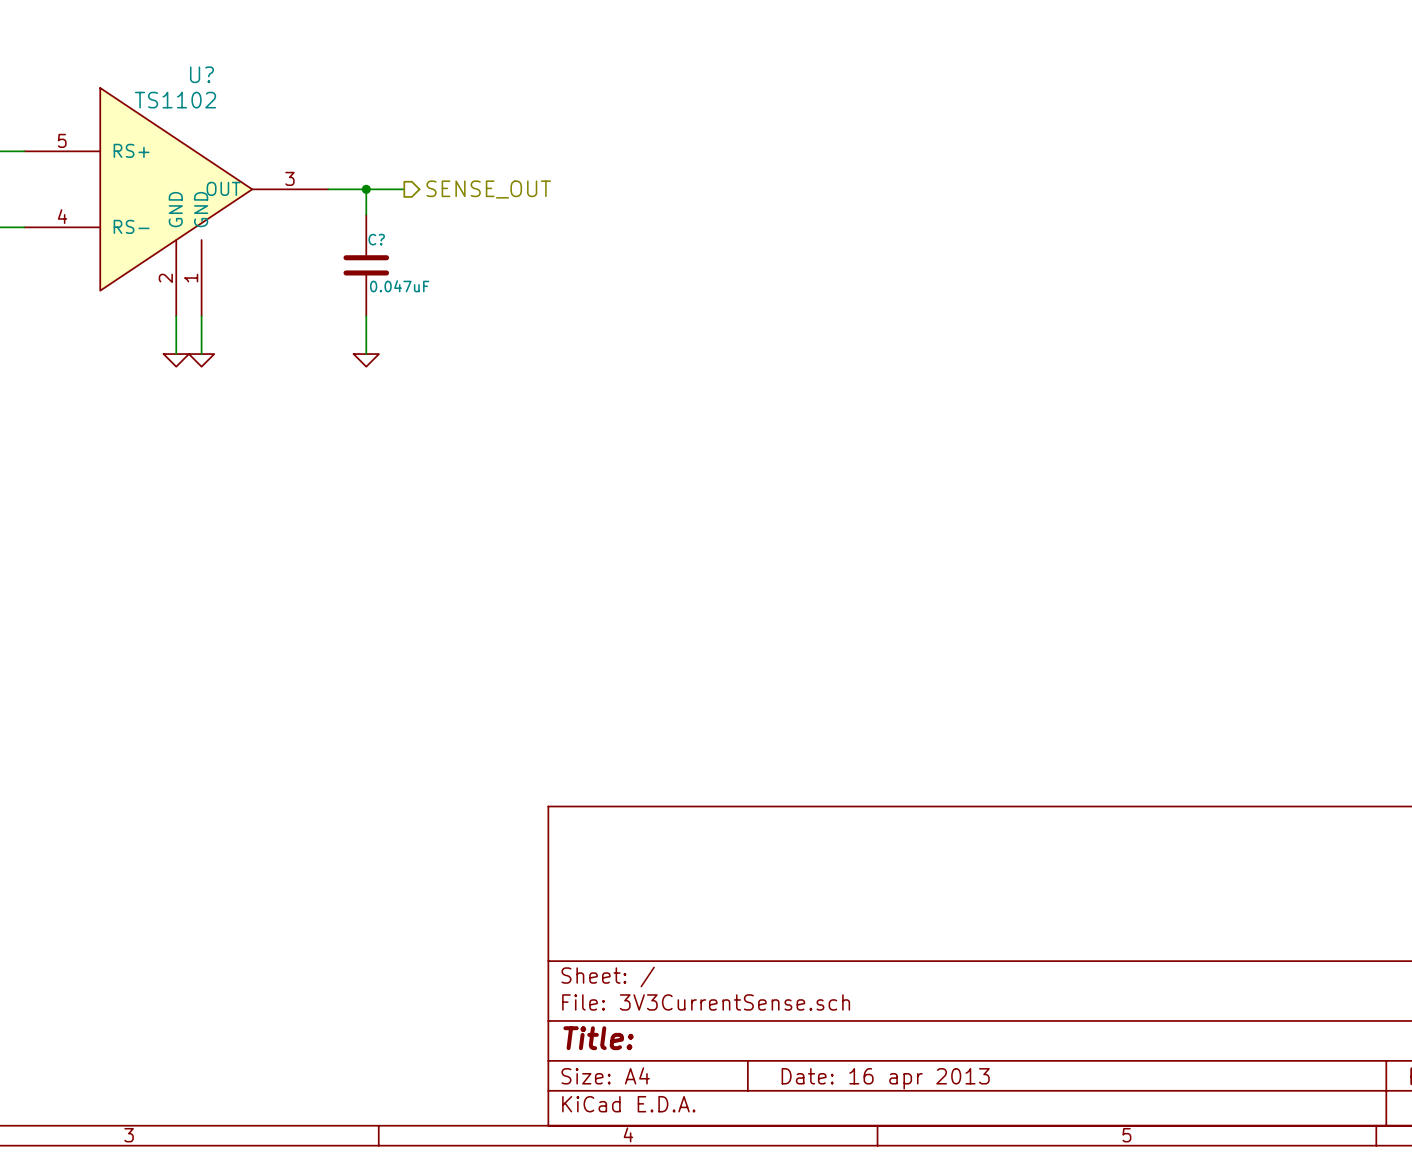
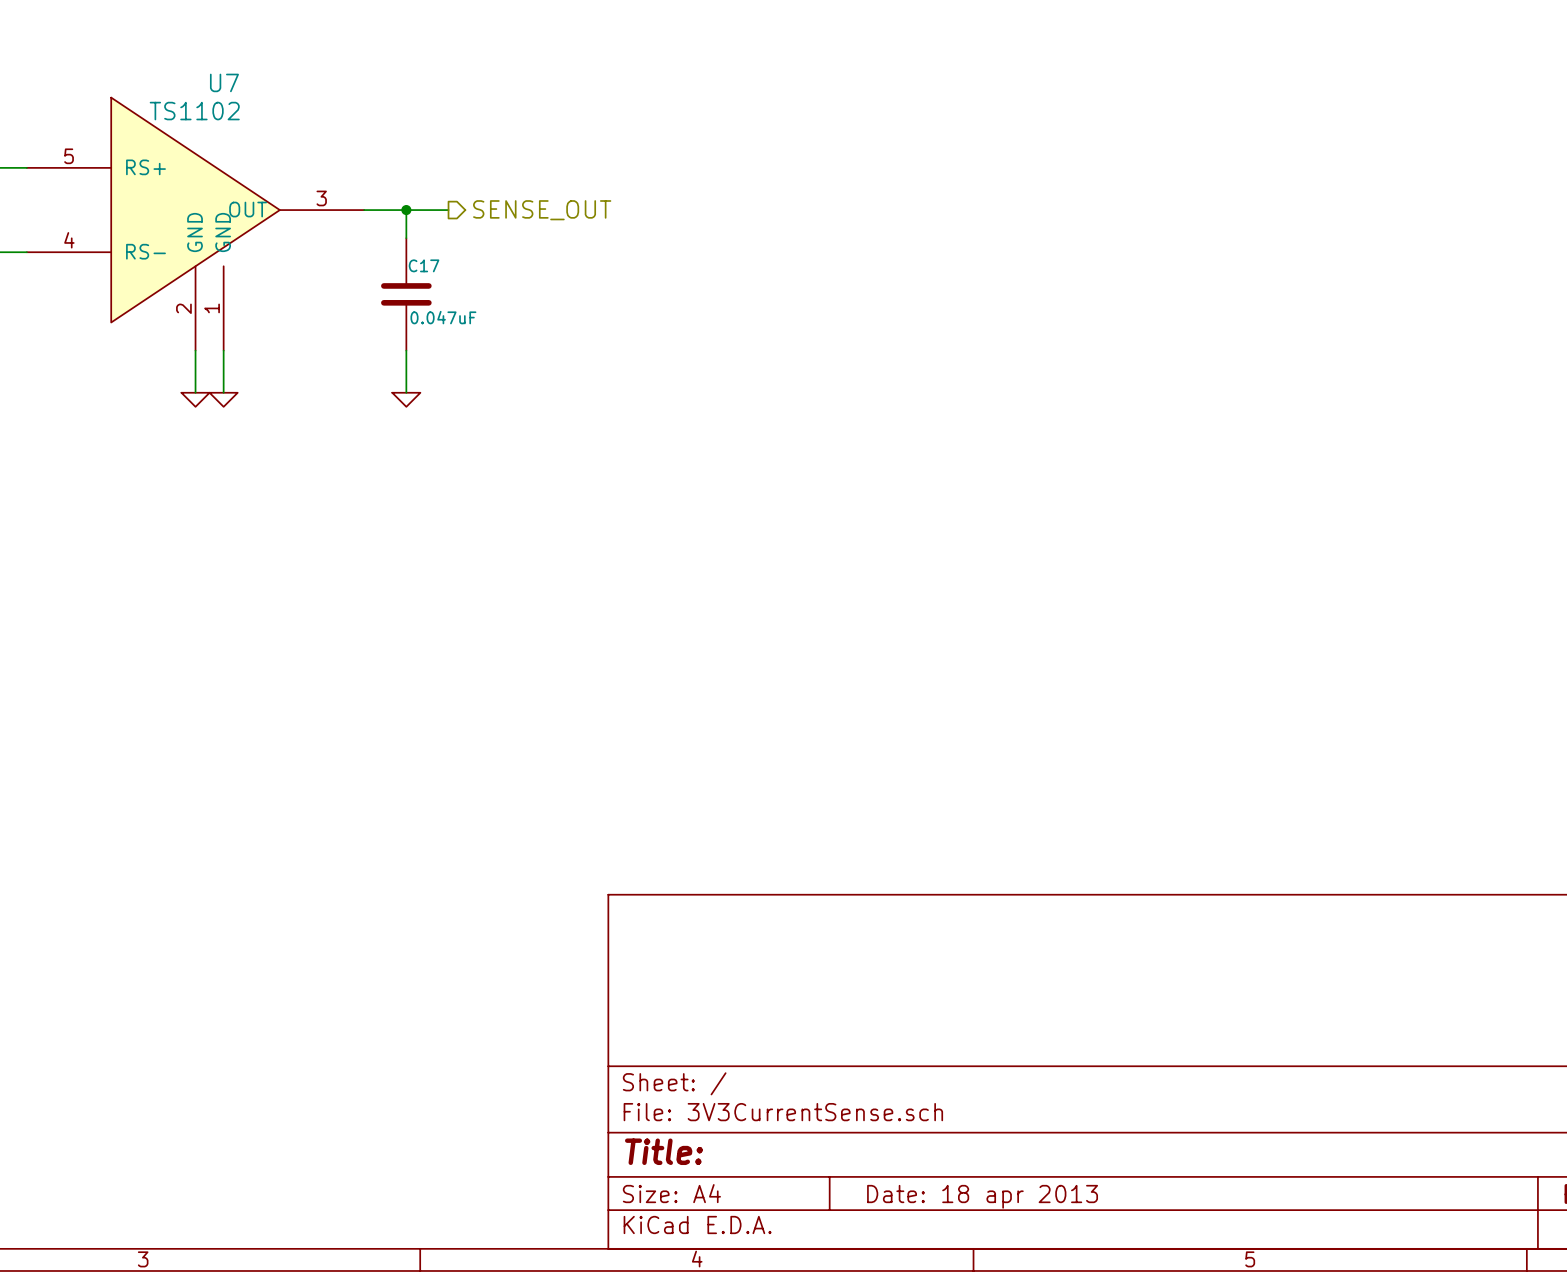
U? name: U? (201, 74) -> U7 (224, 82)
C? name: C? (376, 239) -> C17 (424, 265)
title block: Date: 16 apr 2013 (885, 1078) -> Date: 18 apr 2013 (982, 1196)

